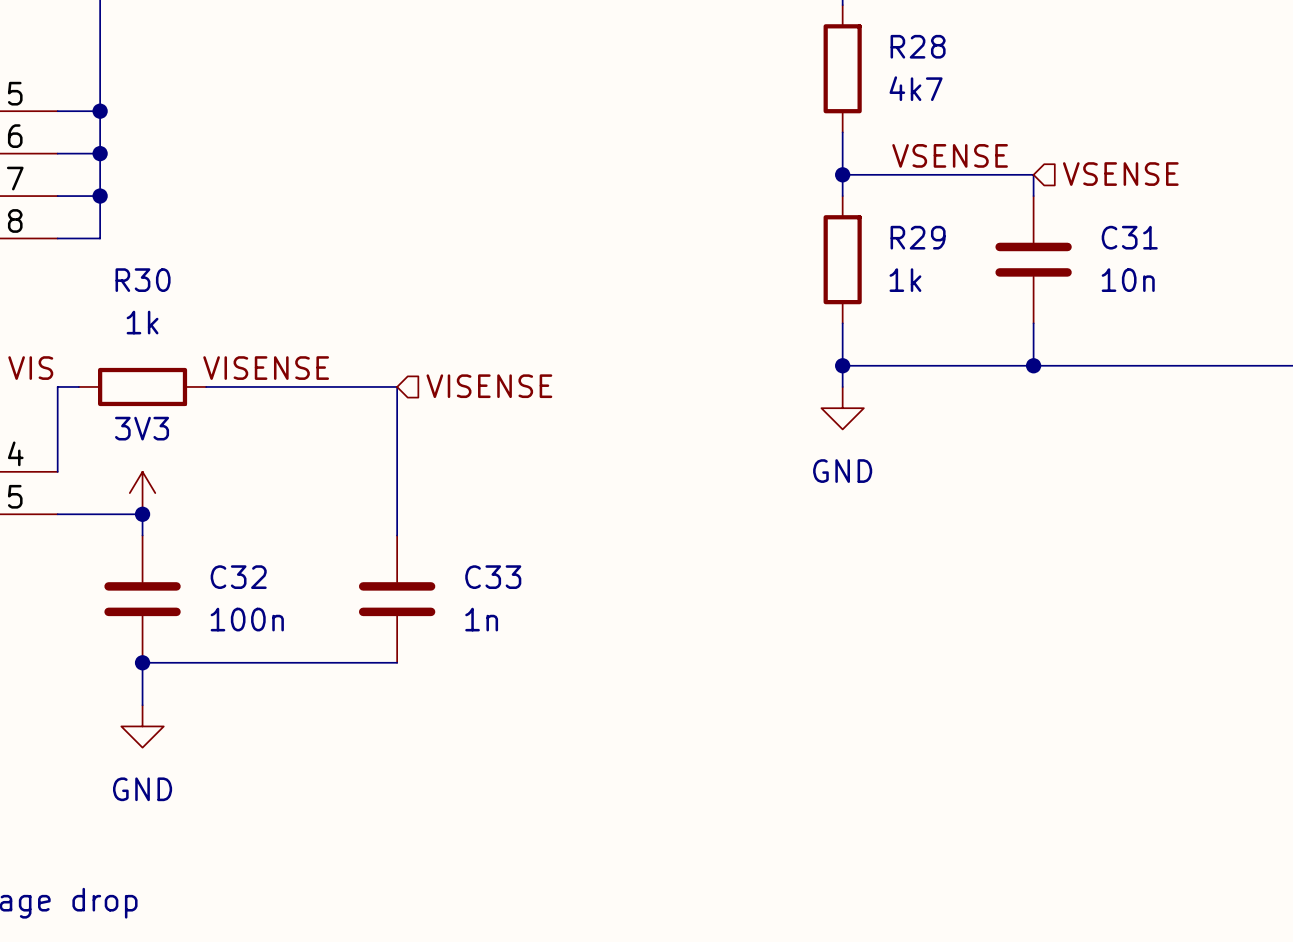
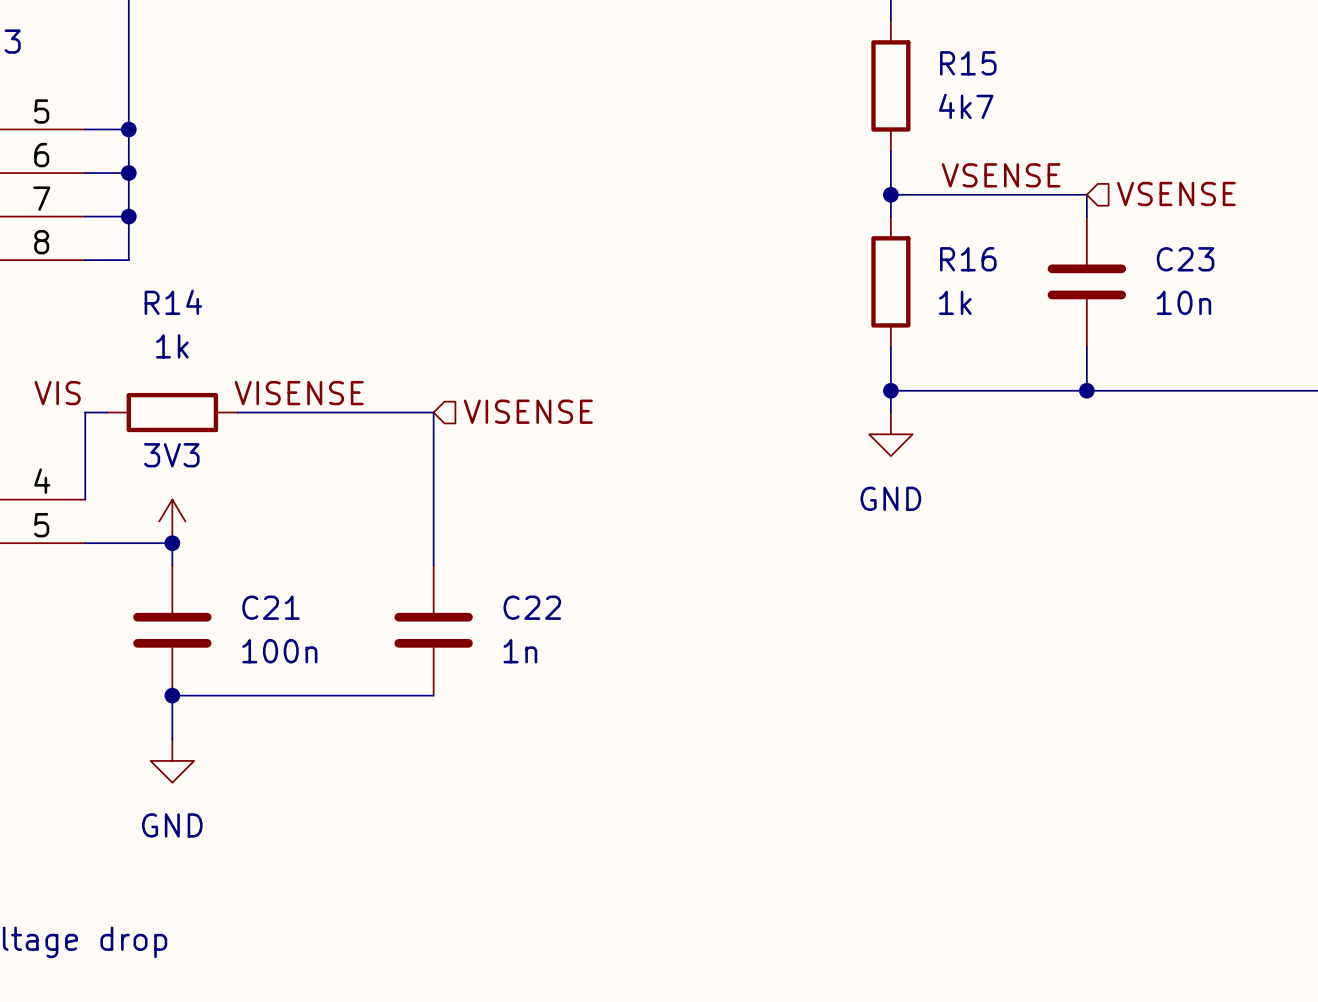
R28 name: R28 (918, 46) -> R15 (968, 63)
R29 name: R29 (918, 237) -> R16 (968, 259)
C31 name: C31 (1129, 237) -> C23 (1185, 259)
R30 name: R30 (143, 280) -> R14 (173, 302)
C32 name: C32 (238, 577) -> C21 (271, 607)
C33 name: C33 (493, 577) -> C22 (532, 607)

